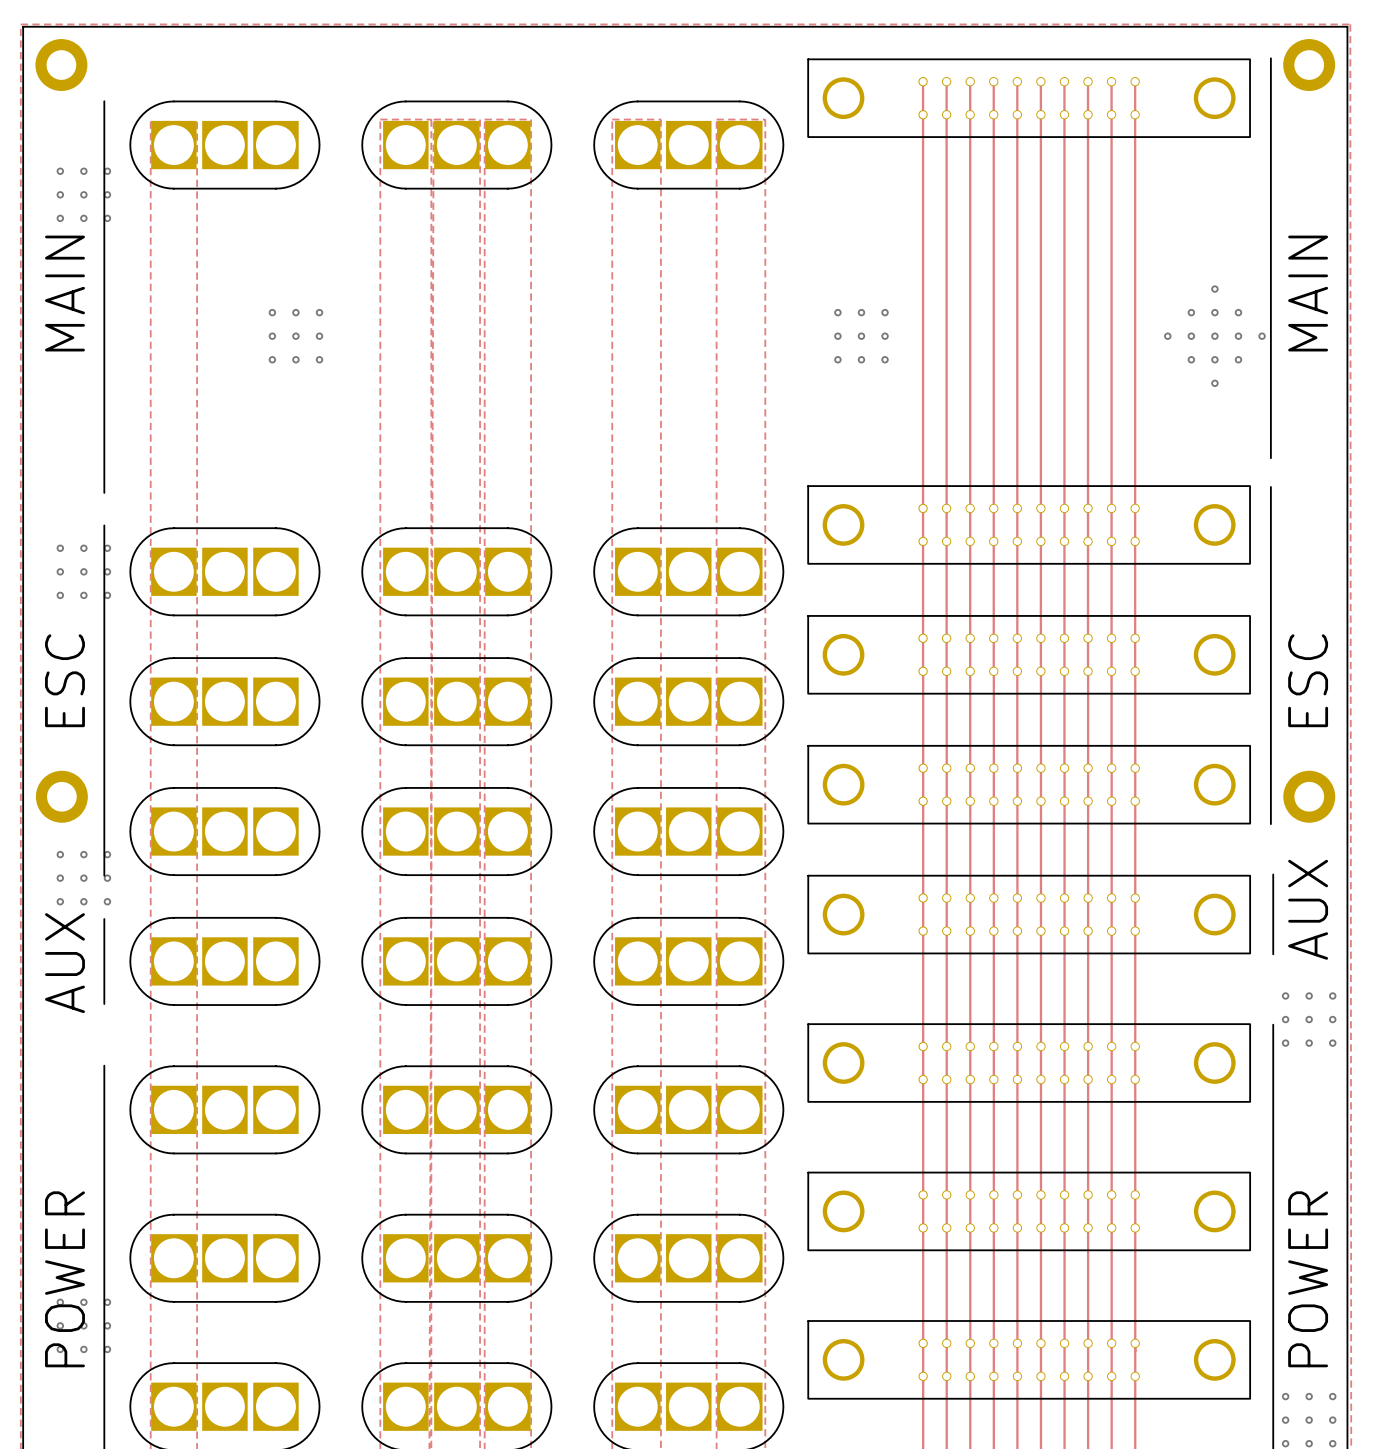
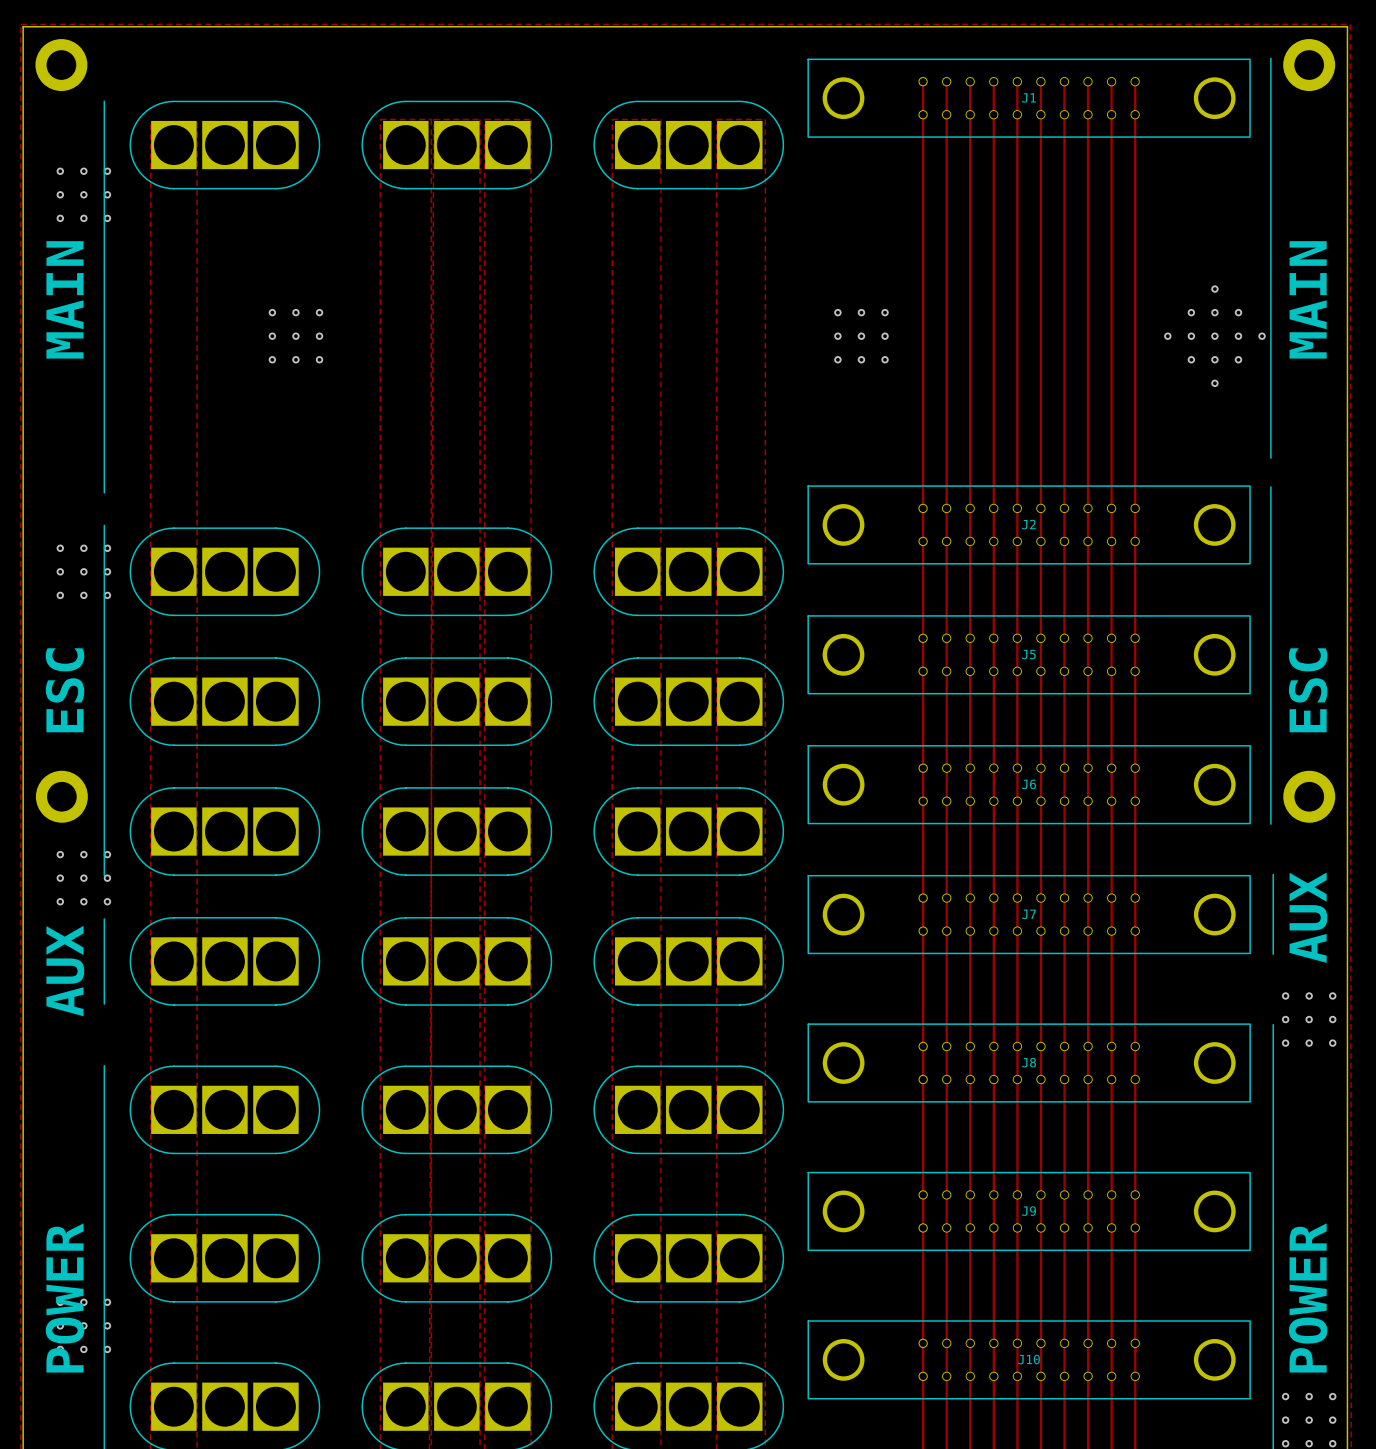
J1 name: none -> J1 (1029, 97)
J2 name: none -> J2 (1028, 524)
J5 name: none -> J5 (1028, 654)
J6 name: none -> J6 (1029, 784)
J7 name: none -> J7 (1029, 914)
J8 name: none -> J8 (1029, 1062)
J9 name: none -> J9 (1029, 1211)
J10 name: none -> J10 (1029, 1359)

